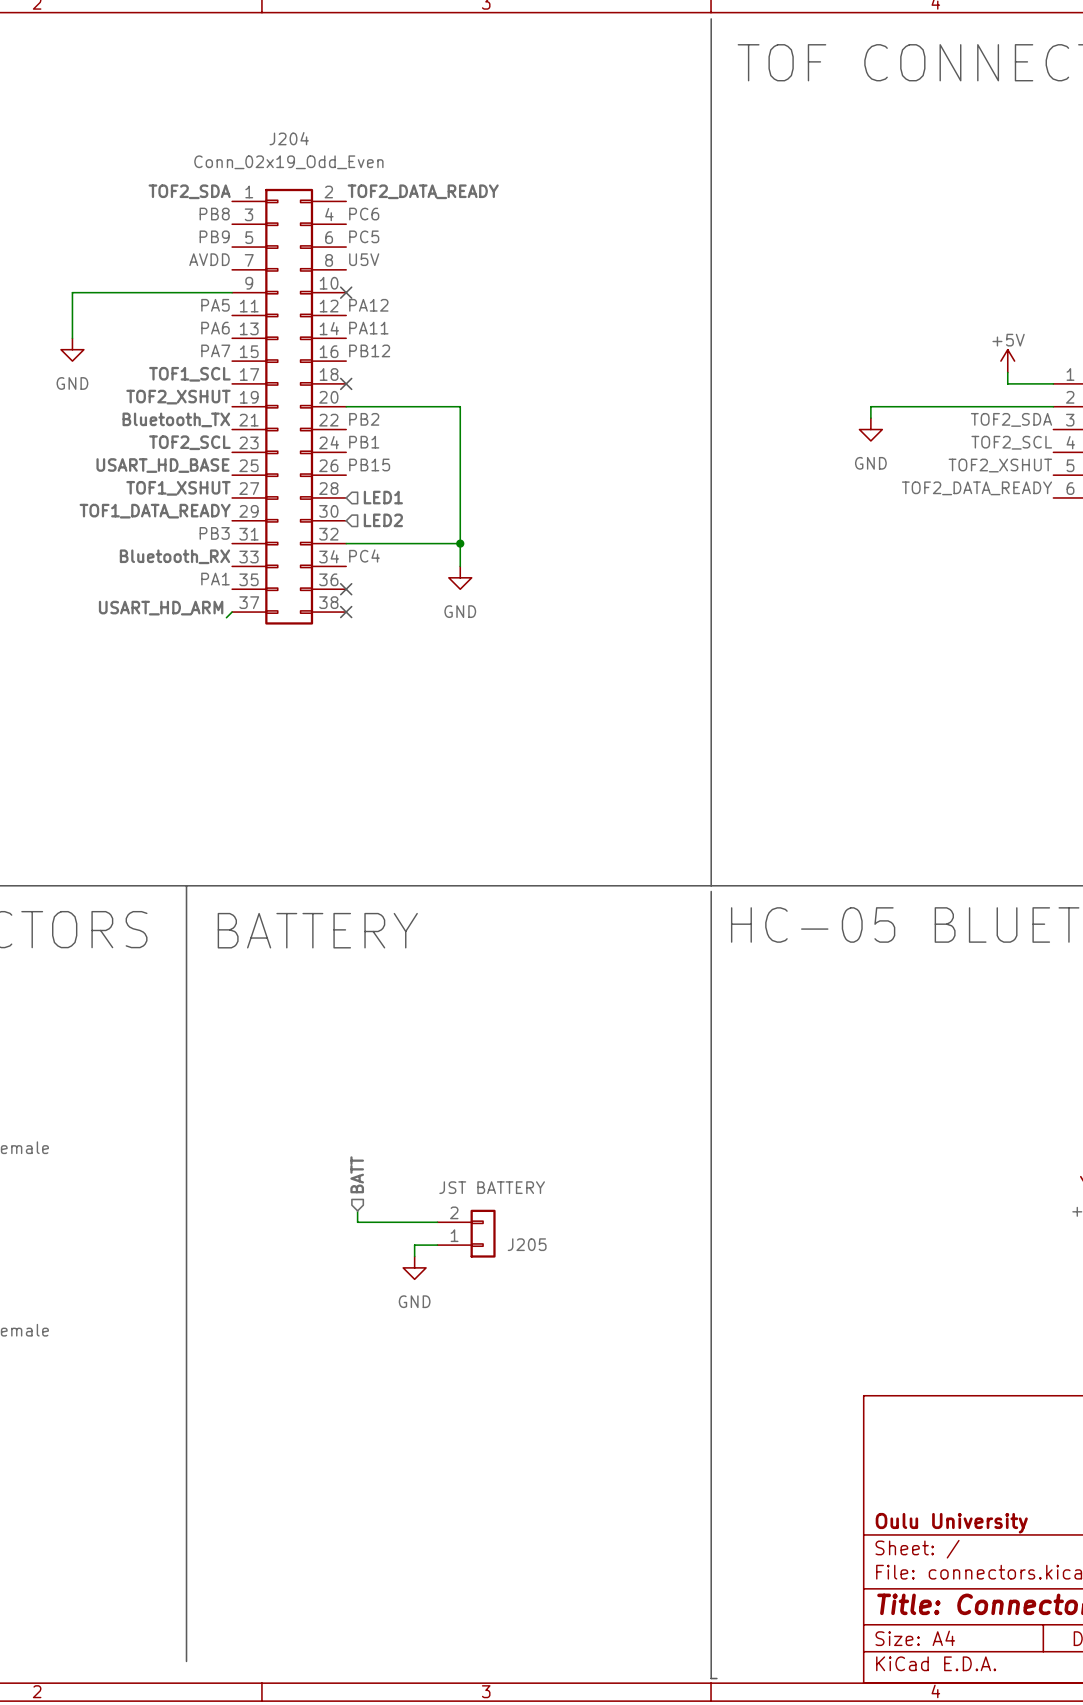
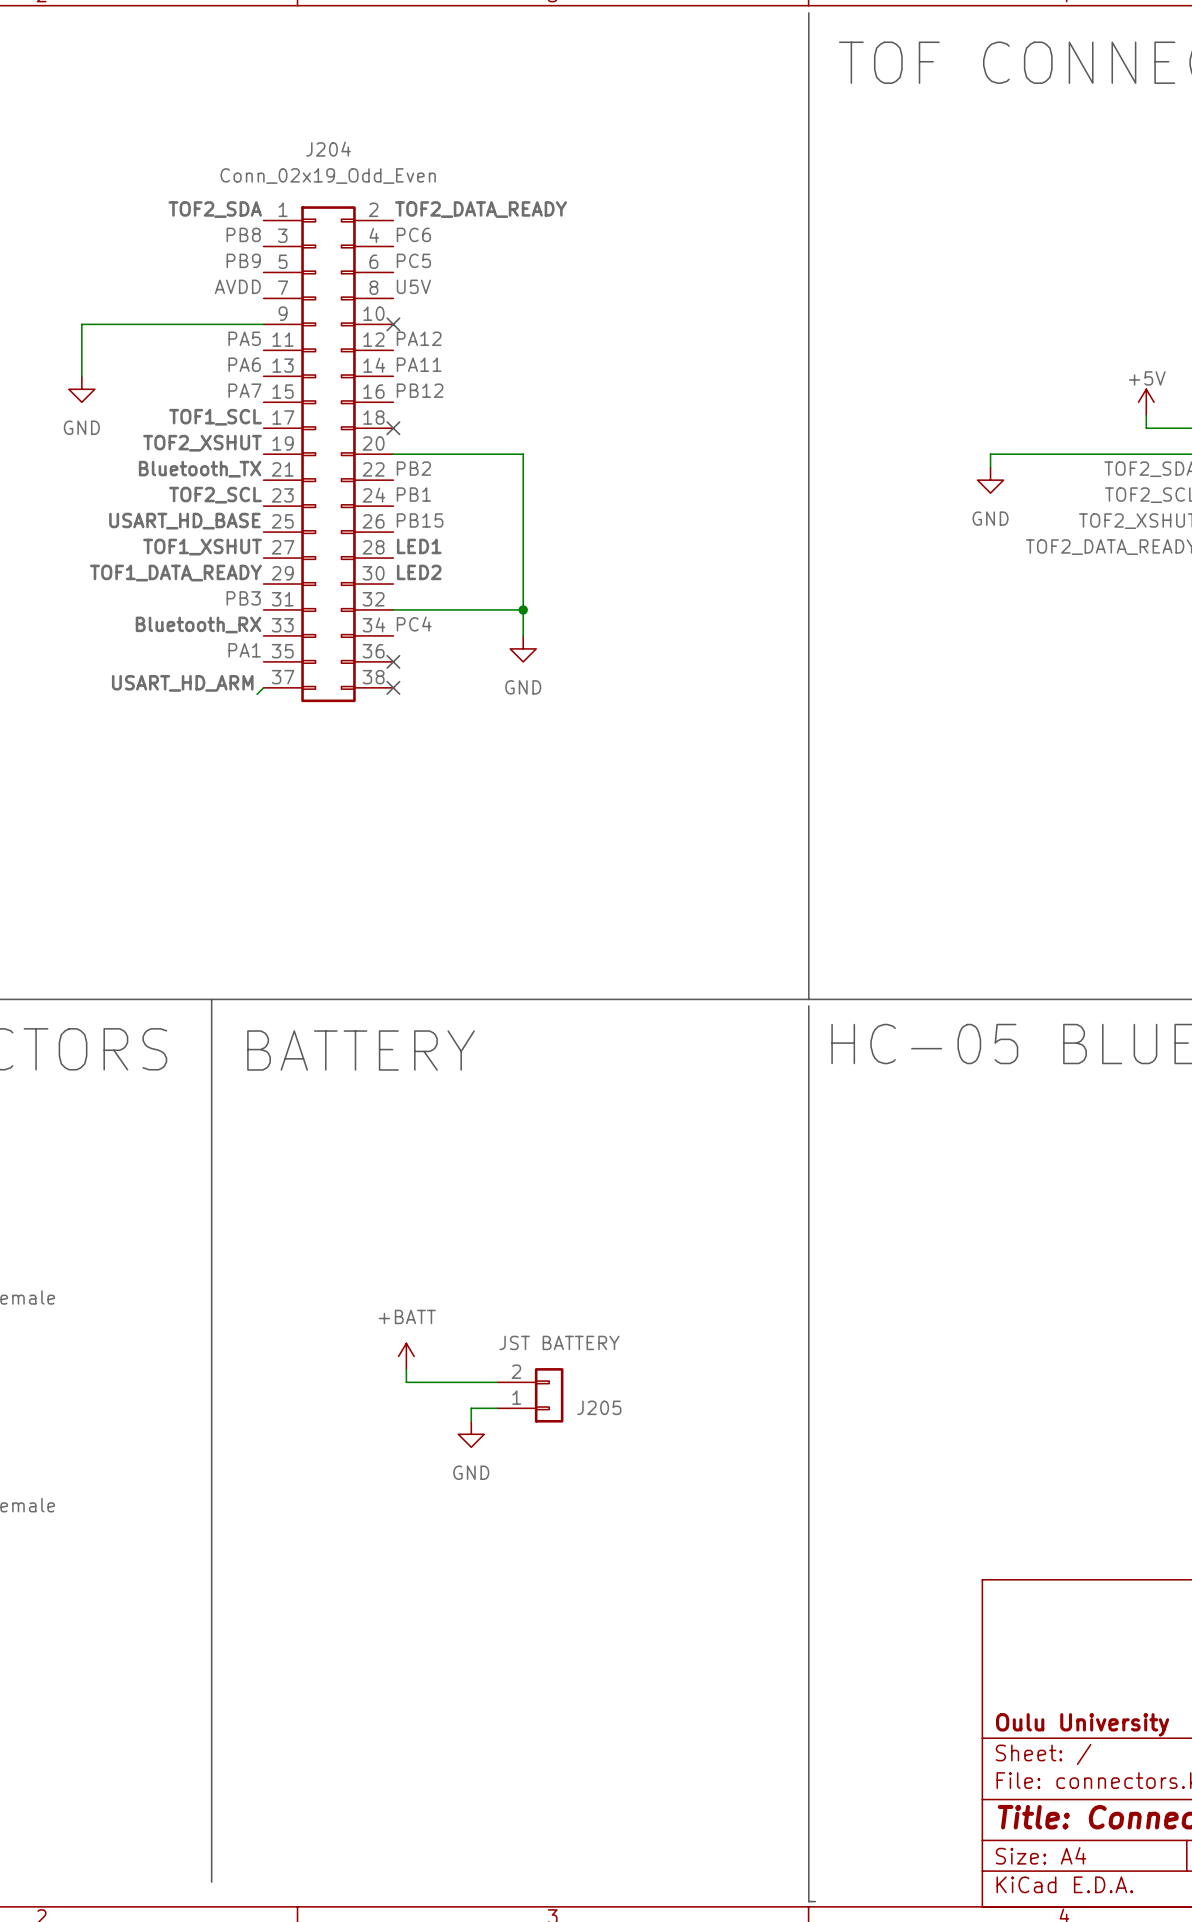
label: none -> LED1 (419, 546)
hierarchical label: LED1 (383, 497) -> none
label: none -> LED2 (419, 572)
hierarchical label: LED2 (383, 520) -> none
hierarchical label: BATT (357, 1174) -> none
power symbol: none -> +BATT (406, 1356)

